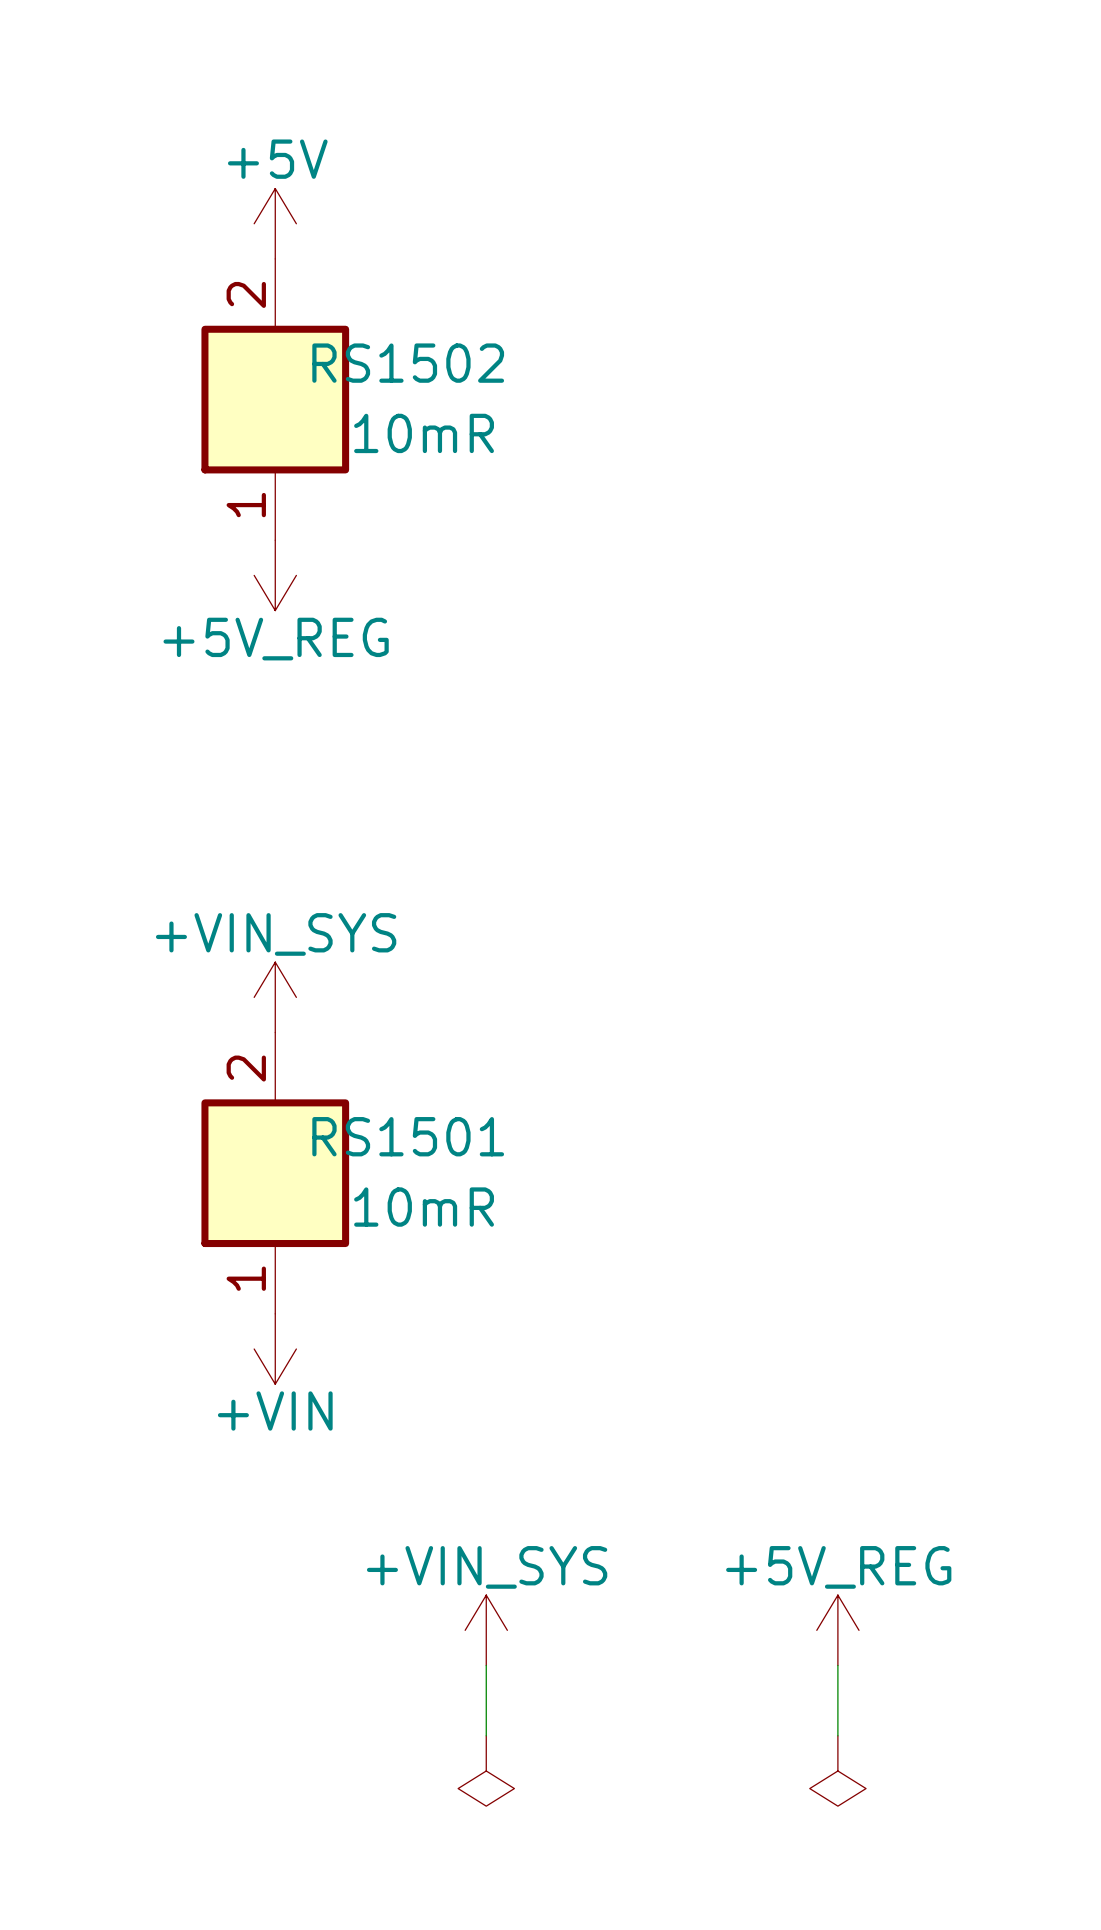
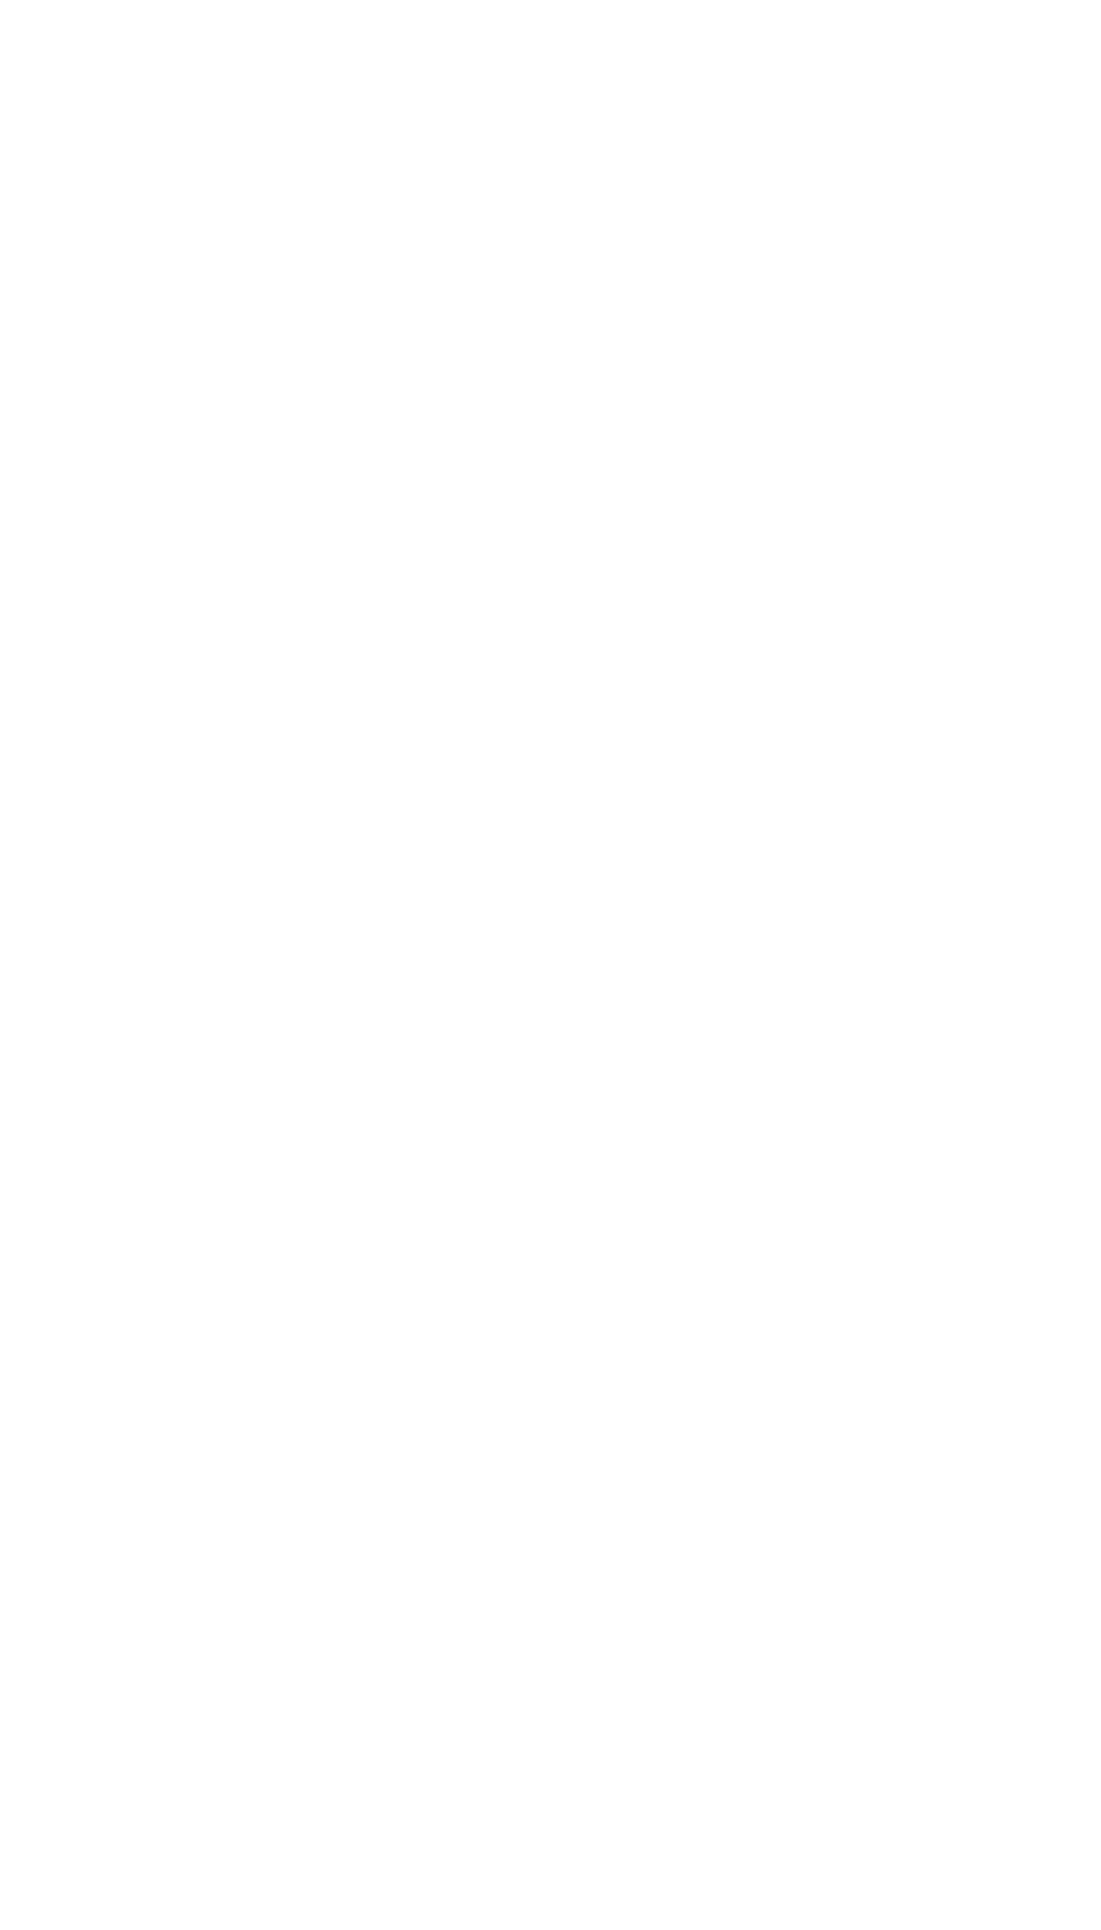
power symbol: +5V (275, 223) -> none
RS1502: 10mR (275, 399) -> none
power symbol: +5V_REG (275, 575) -> none
power symbol: +VIN_SYS (275, 997) -> none
RS1501: 10mR (275, 1173) -> none
power symbol: +VIN (275, 1349) -> none
power symbol: +VIN_SYS (486, 1630) -> none
power symbol: +5V_REG (837, 1630) -> none
wire: (486, 1665) (486, 1735) -> none
wire: (837, 1665) (837, 1735) -> none
power symbol: (486, 1770) -> none
power symbol: (837, 1770) -> none

